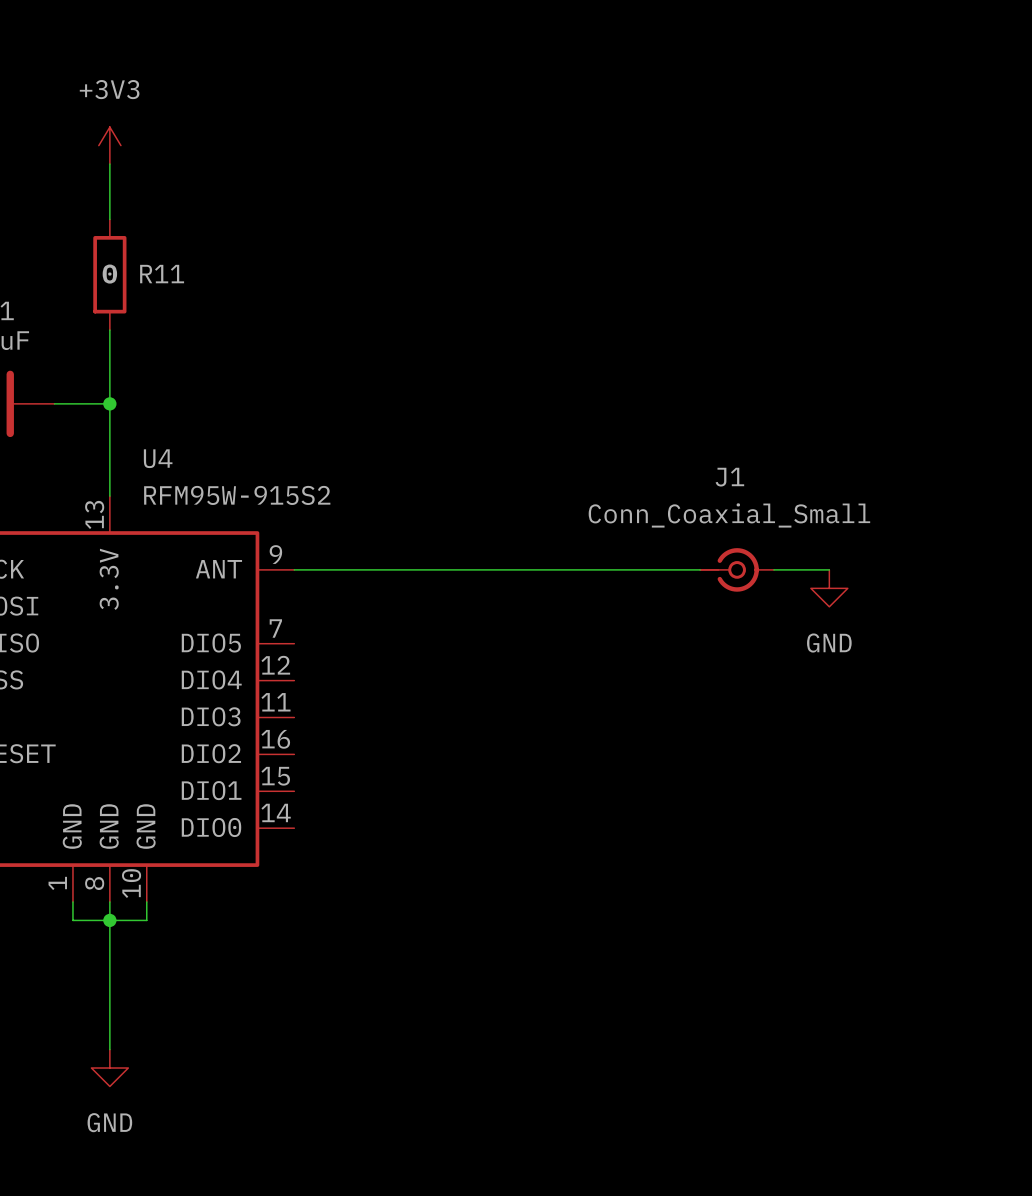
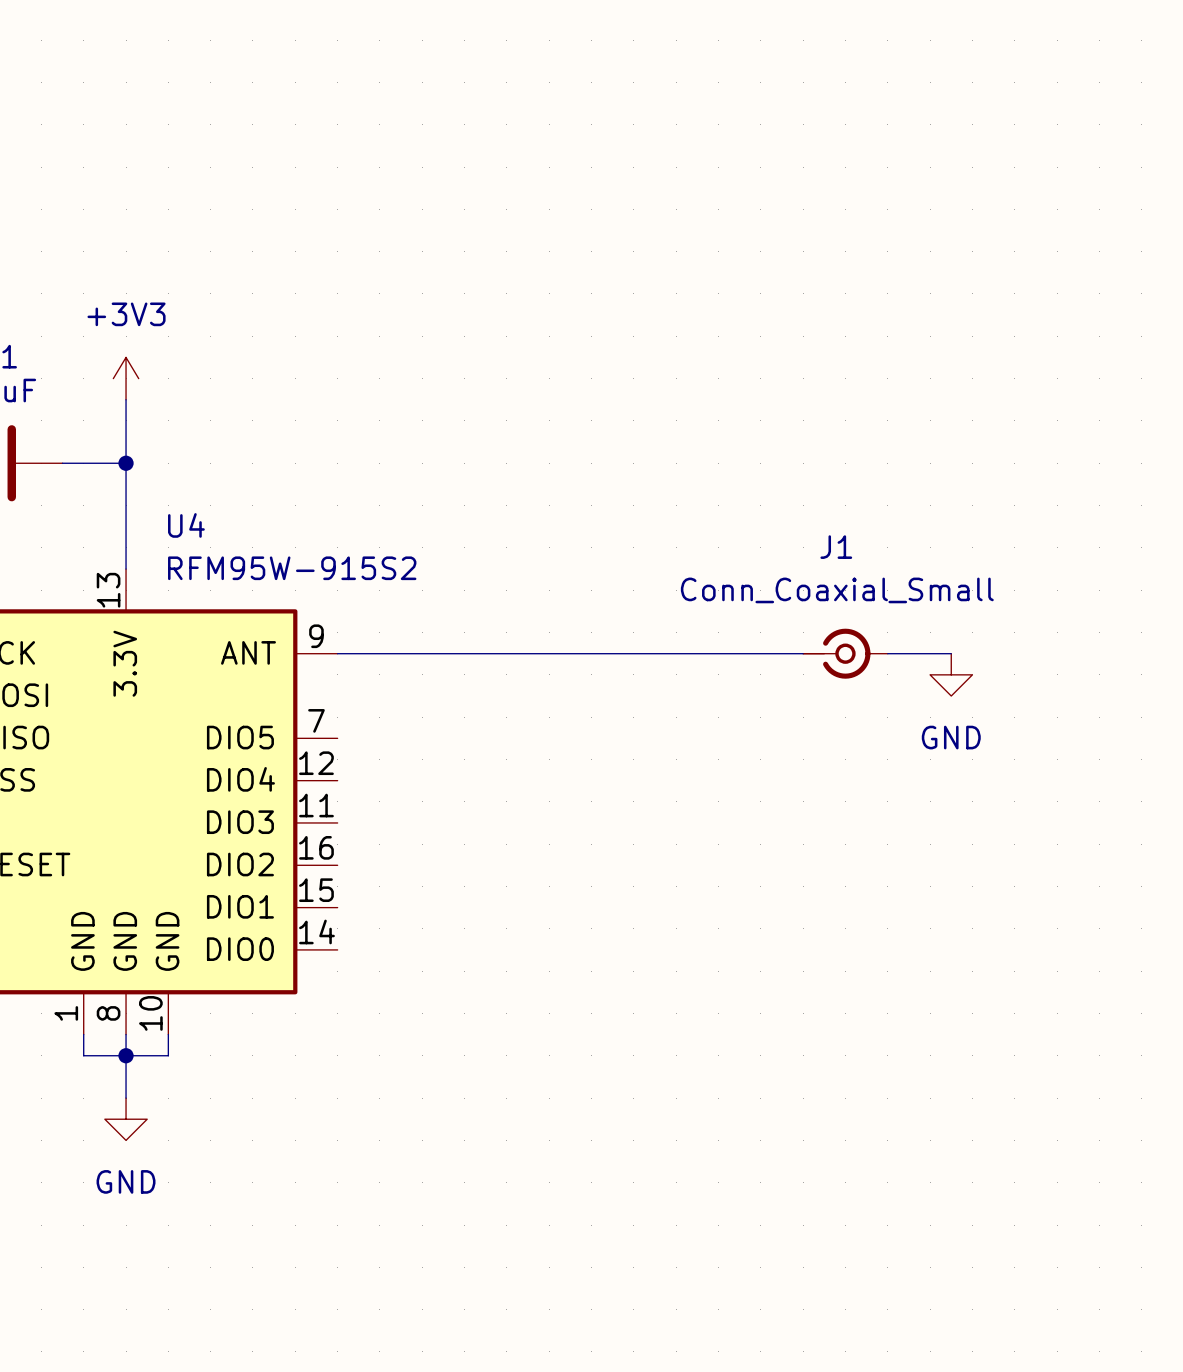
power symbol position: +3V3 (109, 145) -> +3V3 (126, 378)
wire: (109, 164) (109, 219) -> none
R11: 0 (109, 274) -> none
wire: (109, 957) (109, 1049) -> none
power symbol position: GND (109, 1068) -> GND (126, 1119)

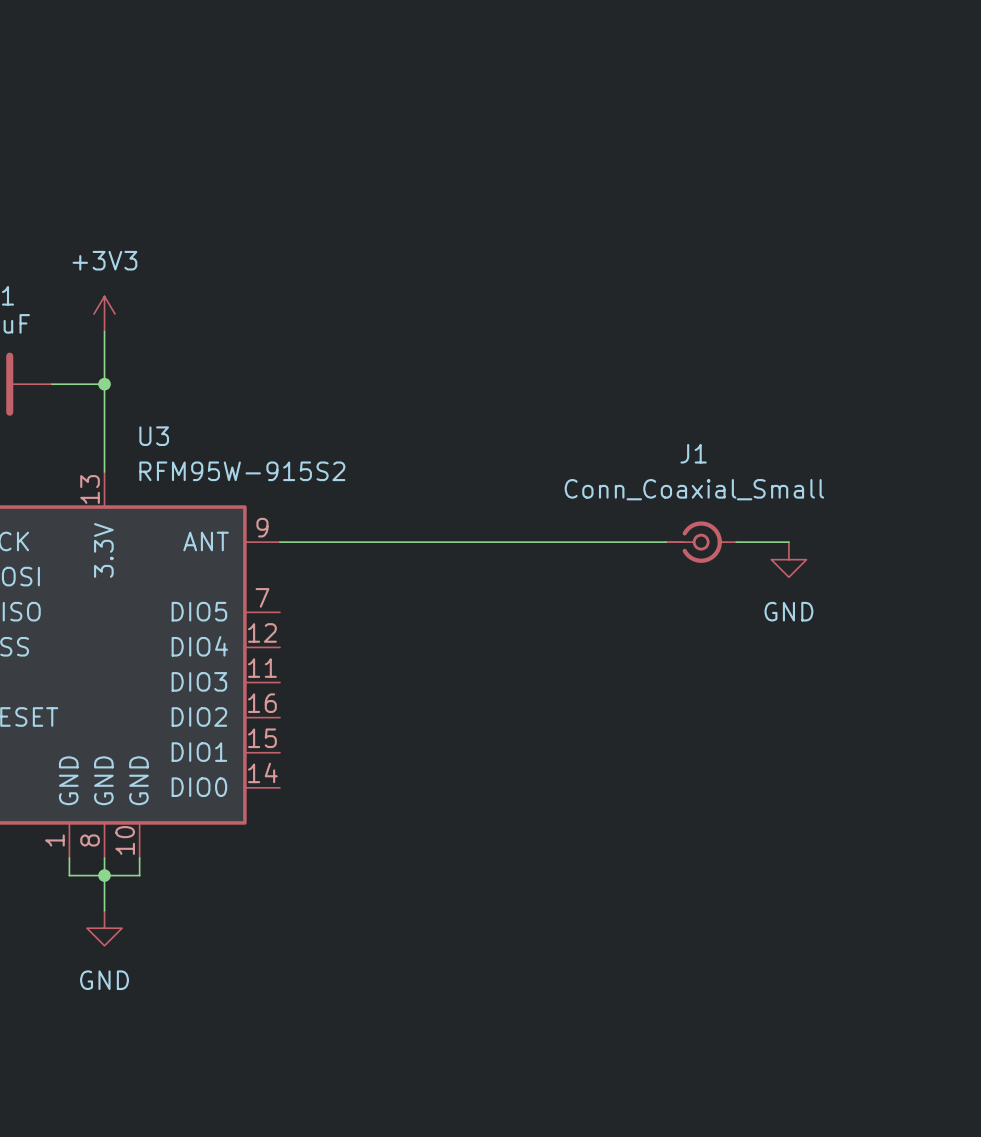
U4 name: U4 (186, 525) -> U3 (154, 436)

